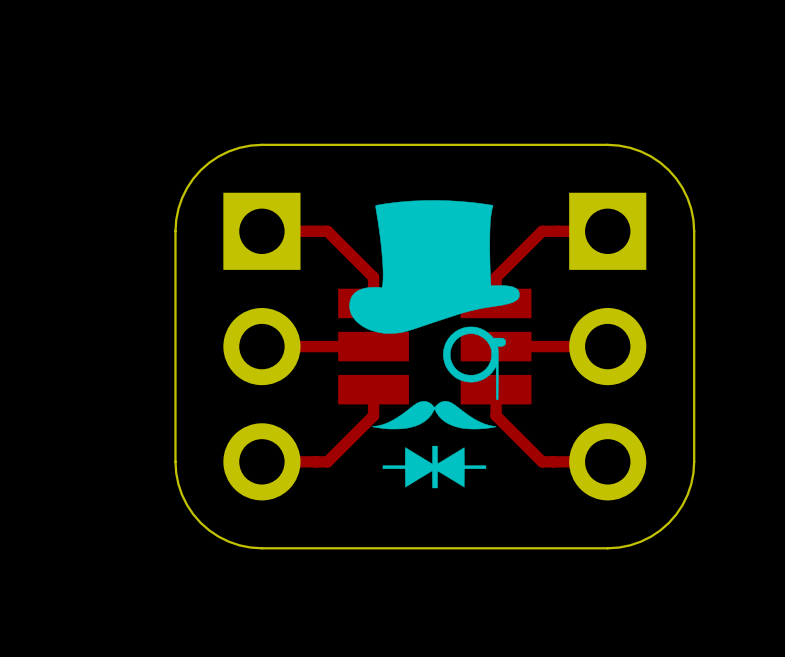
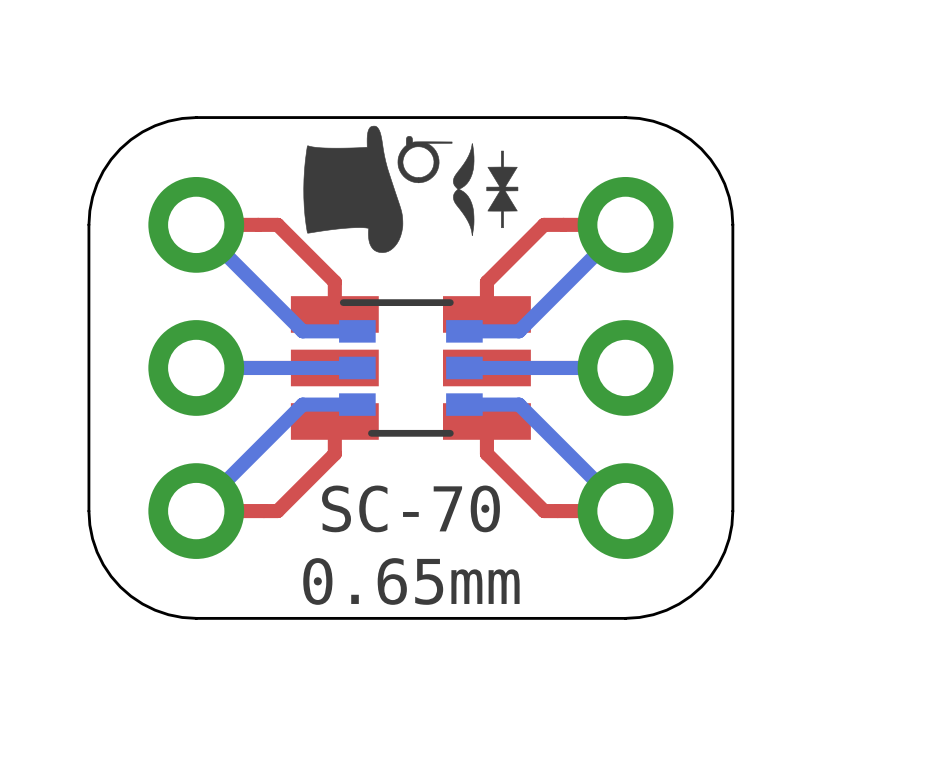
drawing: none -> [303, 125, 519, 253]
part footprint: [223, 192, 301, 501] -> [148, 176, 245, 559]
part footprint: [569, 192, 647, 501] -> [577, 176, 674, 559]
drawing: [349, 200, 520, 489] -> none
bottom track: none -> (196, 224) (302, 331) (357, 331)
bottom track: none -> (625, 224) (519, 331) (464, 331)
bottom track: none -> (357, 367) (196, 367)
part: none -> (410, 367)
bottom track: none -> (625, 367) (464, 367)
bottom track: none -> (357, 404) (302, 404) (196, 511)
bottom track: none -> (464, 404) (519, 404) (625, 511)
text: none -> SC-70 (410, 508)
text: none -> 0.65mm (411, 581)

